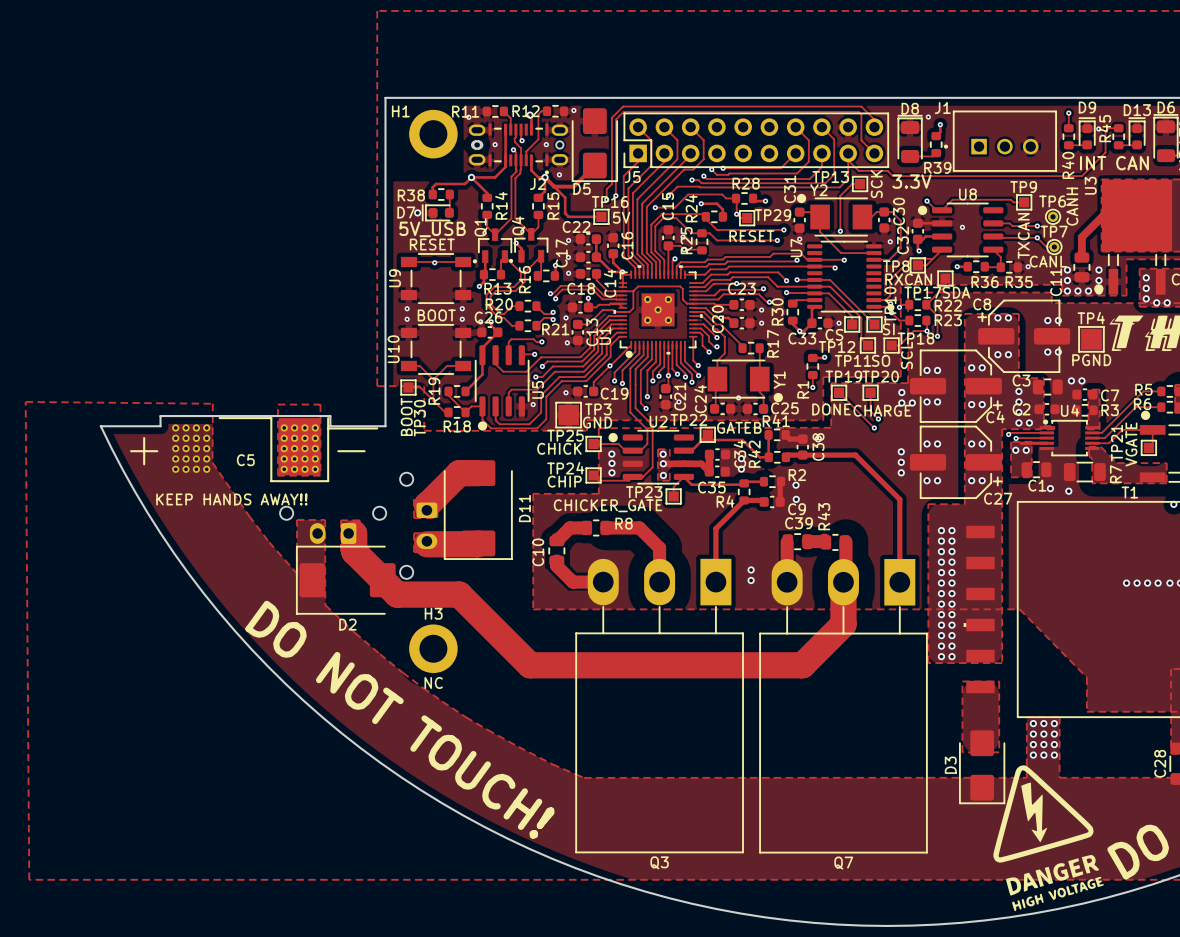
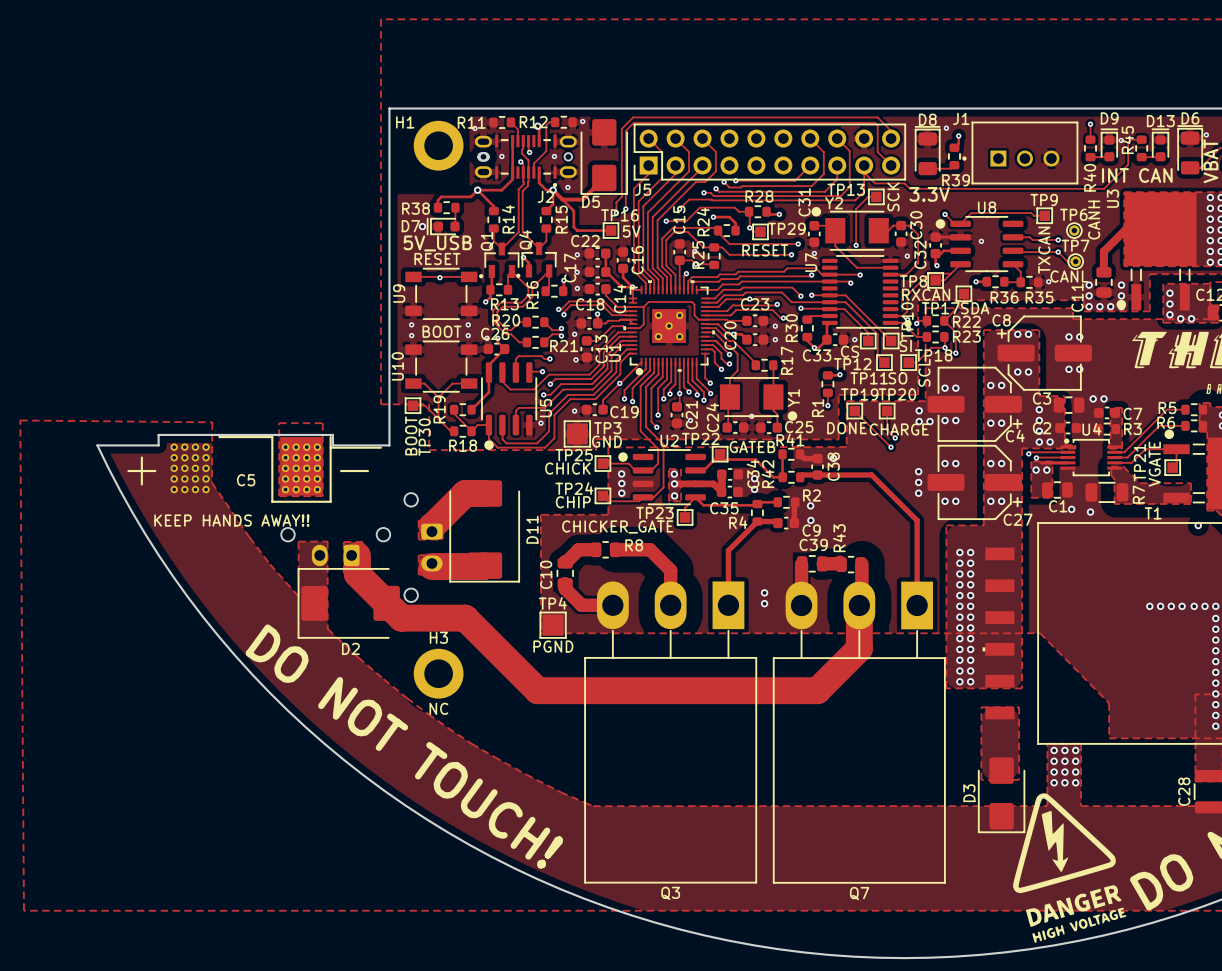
TP4 position: (1091, 339) -> (553, 625)

